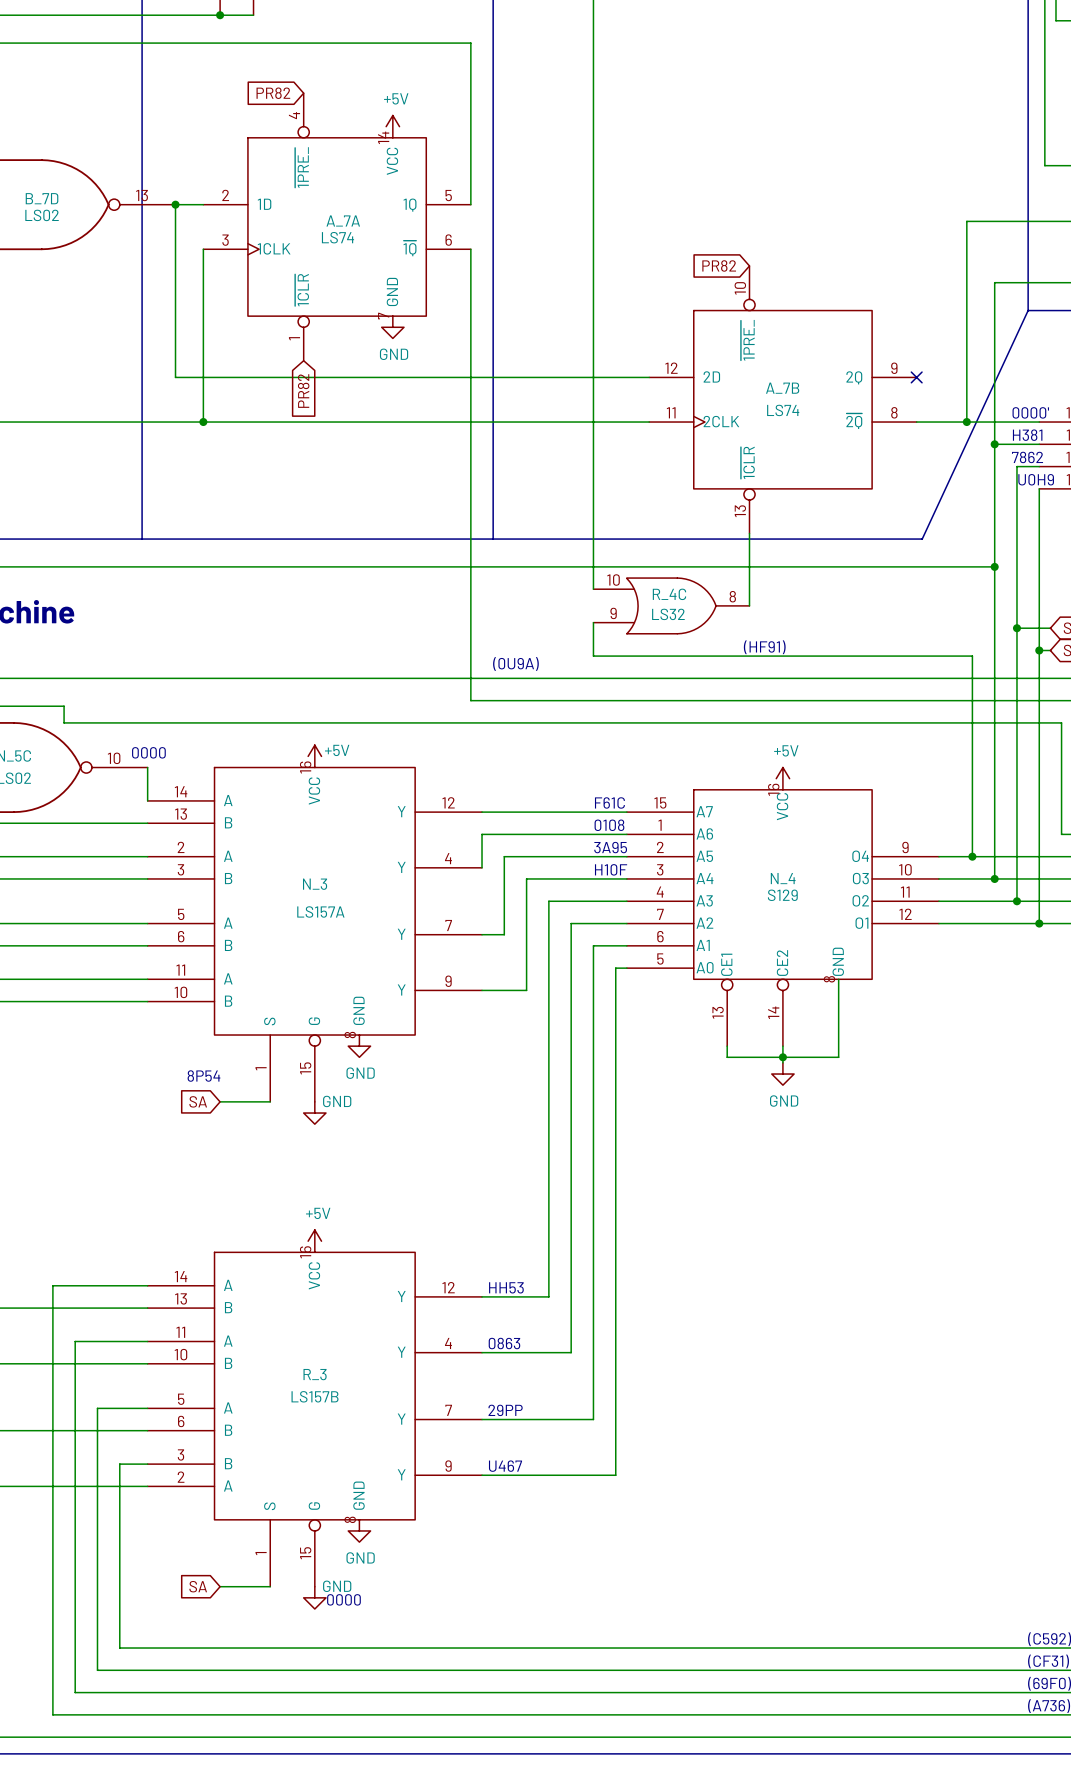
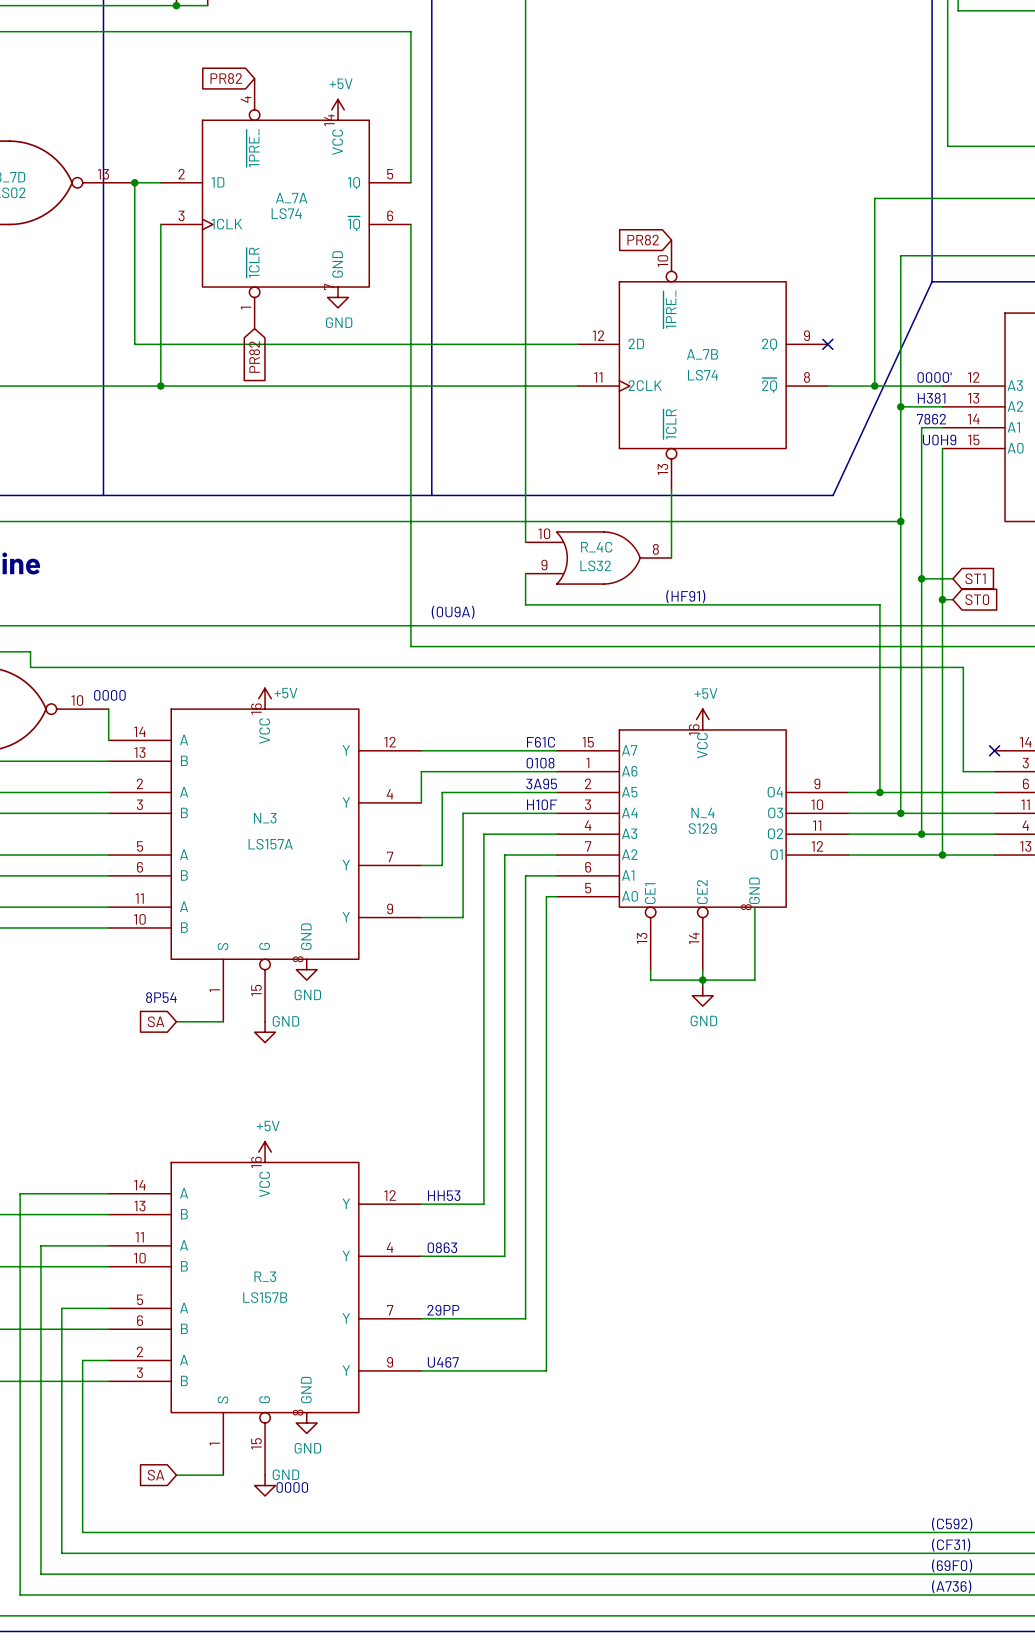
R_3 pin number: 3 (180, 1454) -> 2 (139, 1351)
R_3 pin name: B (228, 1463) -> A (184, 1360)
R_3 pin number: 2 (181, 1477) -> 3 (139, 1372)
R_3 pin name: A (228, 1485) -> B (184, 1380)

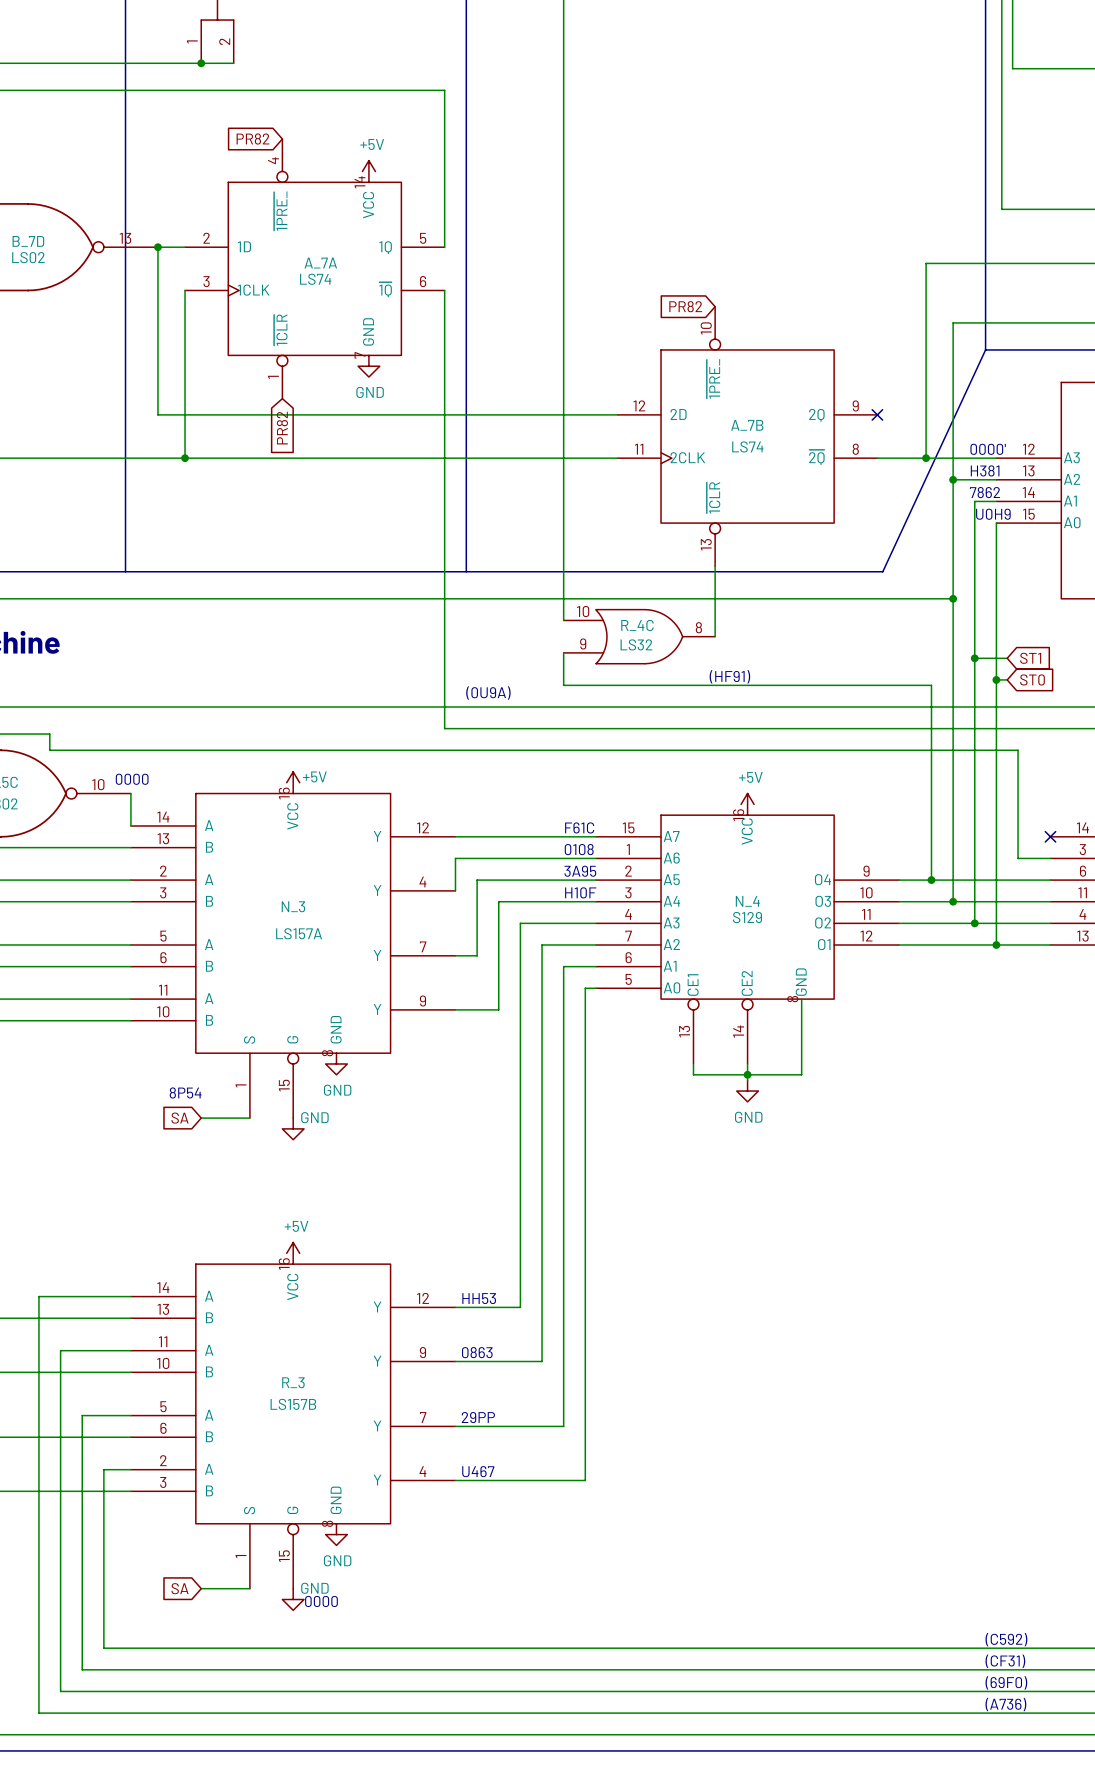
R_3 pin number: 4 (390, 1247) -> 9 (422, 1352)
R_3 pin number: 9 (390, 1362) -> 4 (422, 1471)

